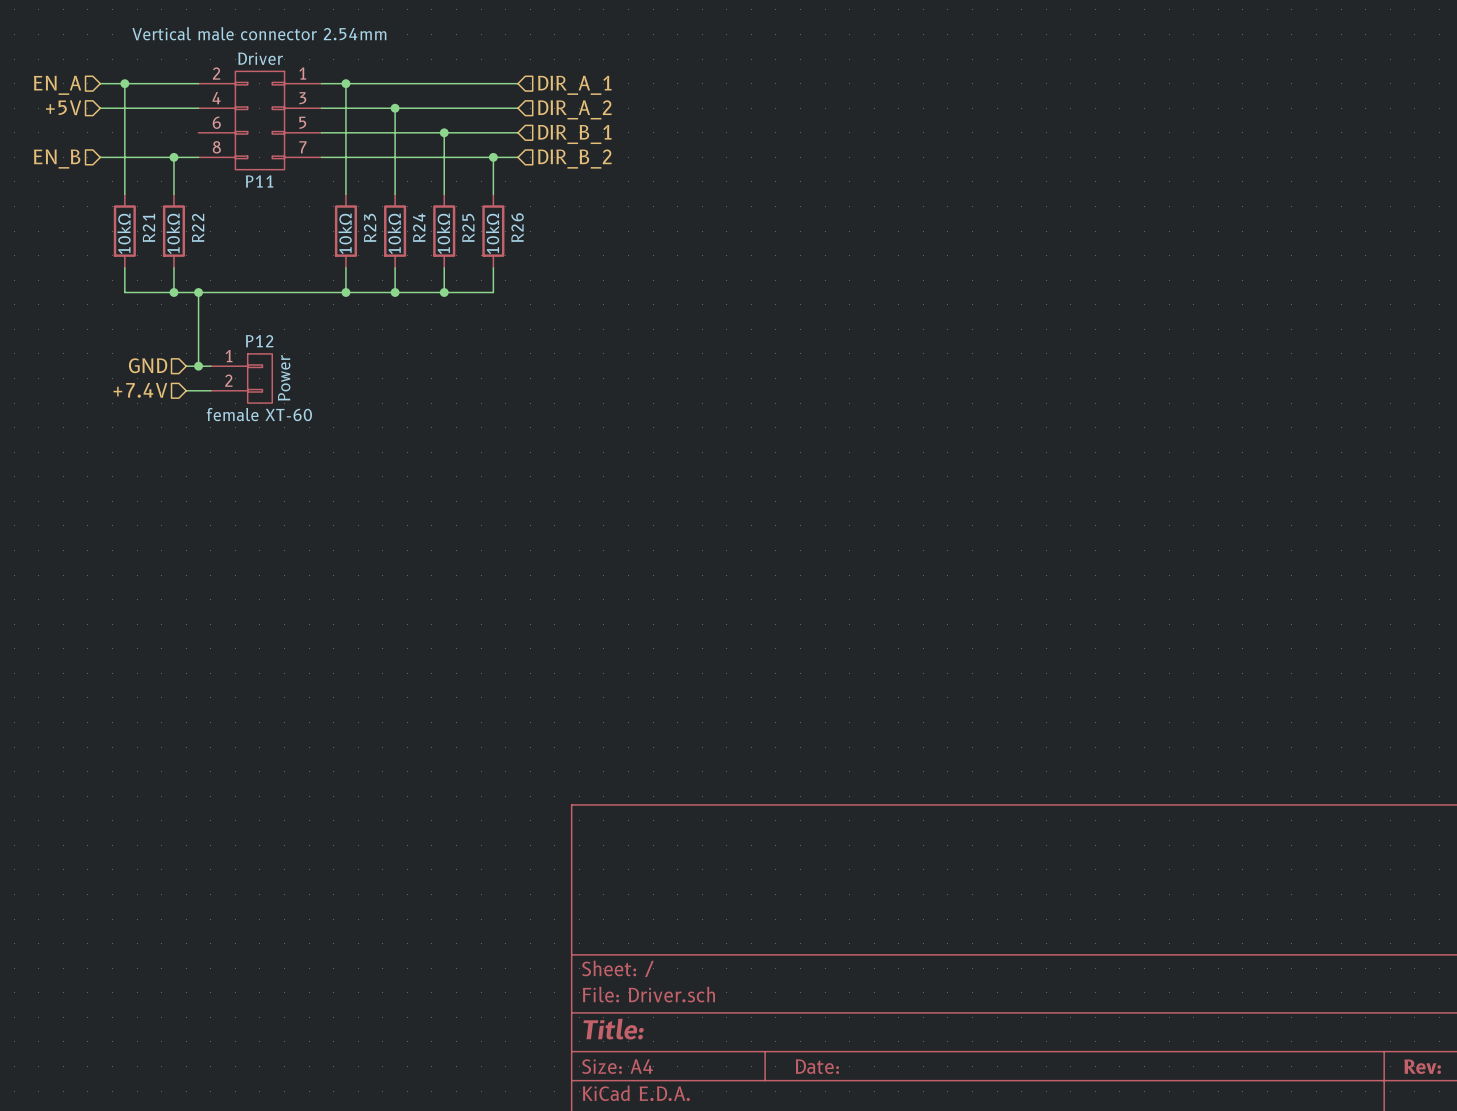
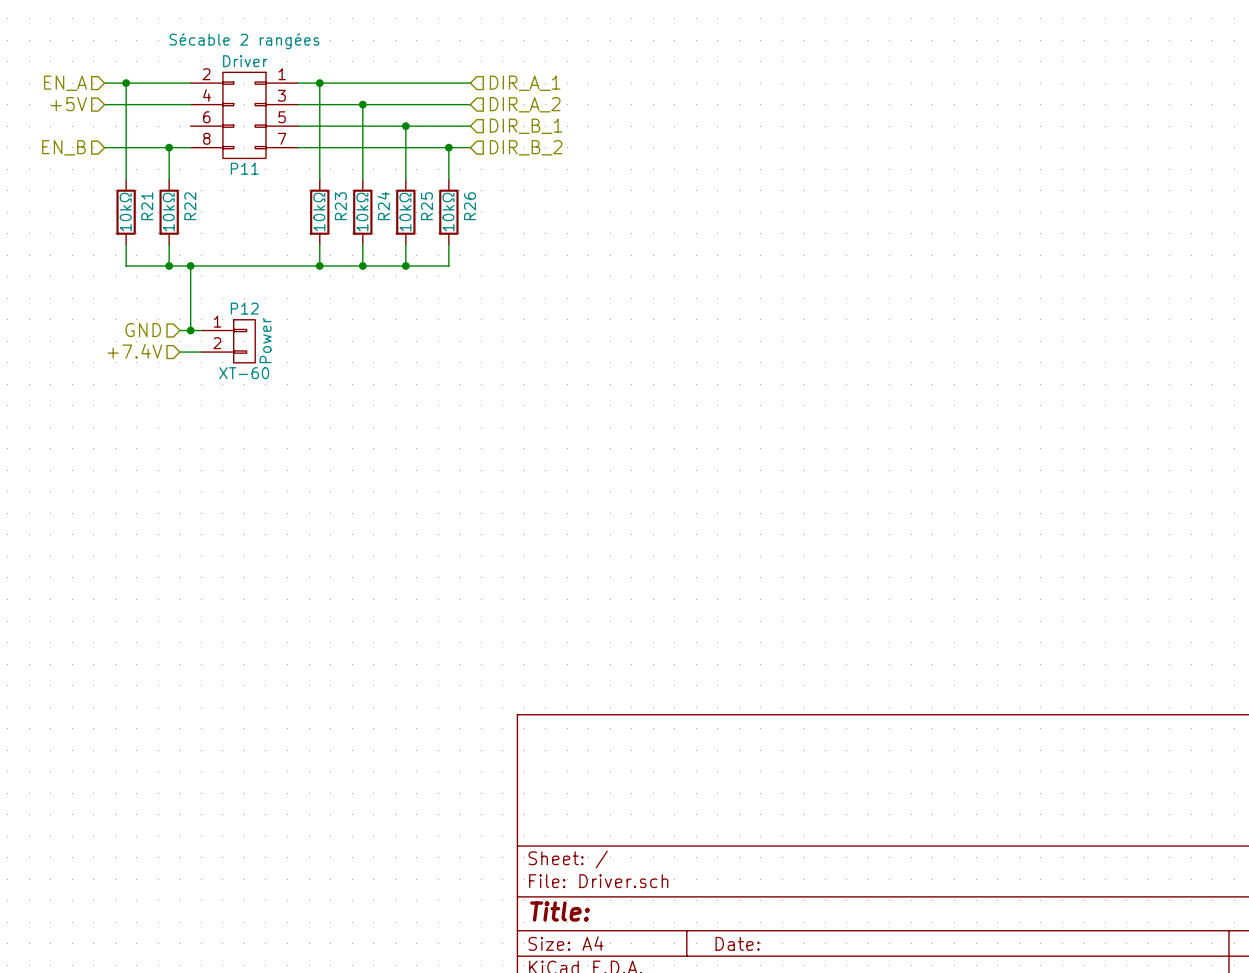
P11 text: Vertical male connector 2.54mm (259, 33) -> Sécable 2 rangées (244, 41)
P12 text: female XT-60 (259, 414) -> XT-60 (244, 373)

